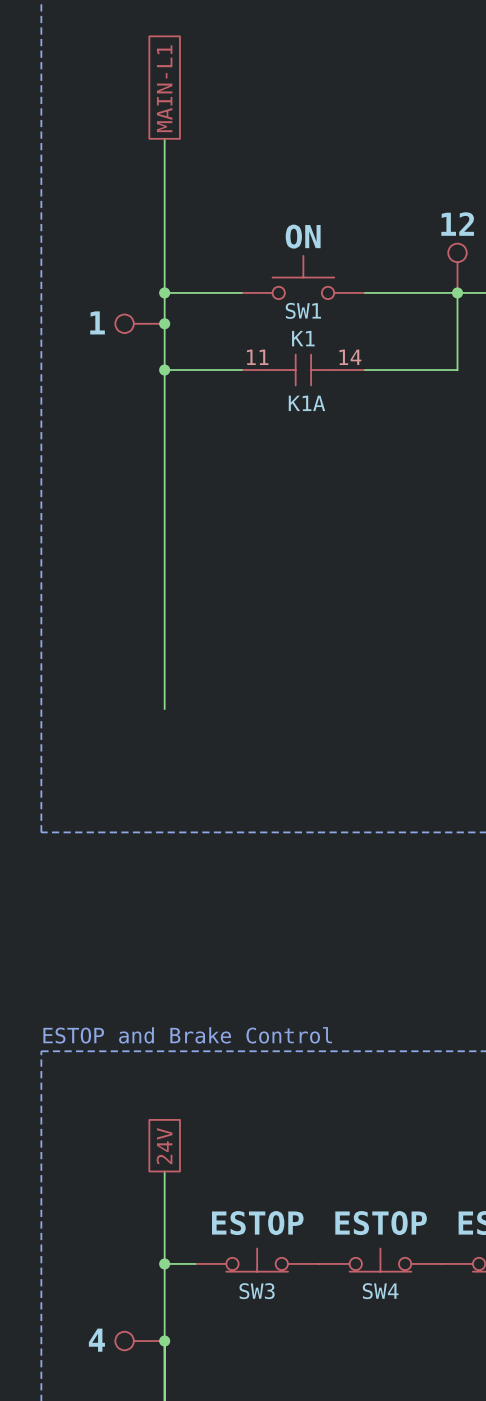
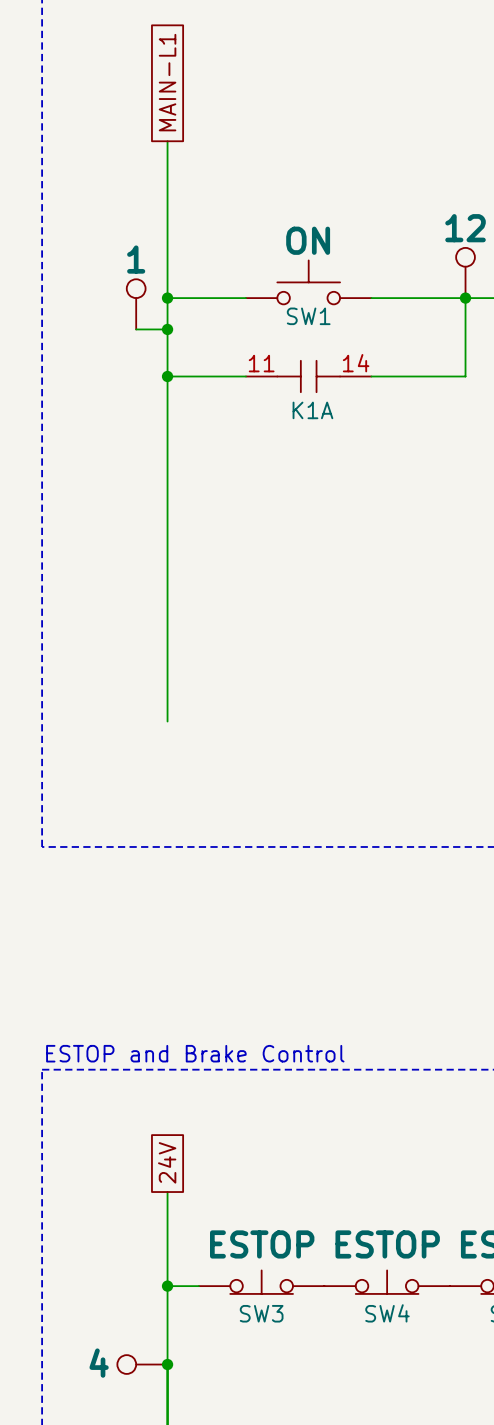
part rotation: 0° (124, 323) -> 90° clockwise (136, 288)
K1A value: K1 (303, 338) -> none

